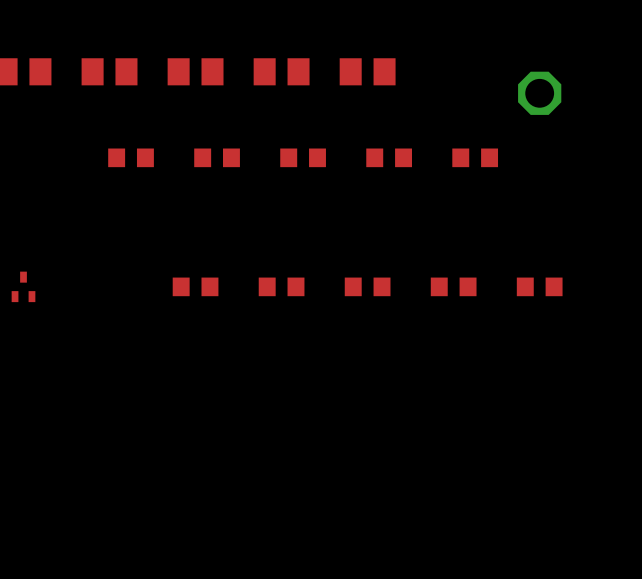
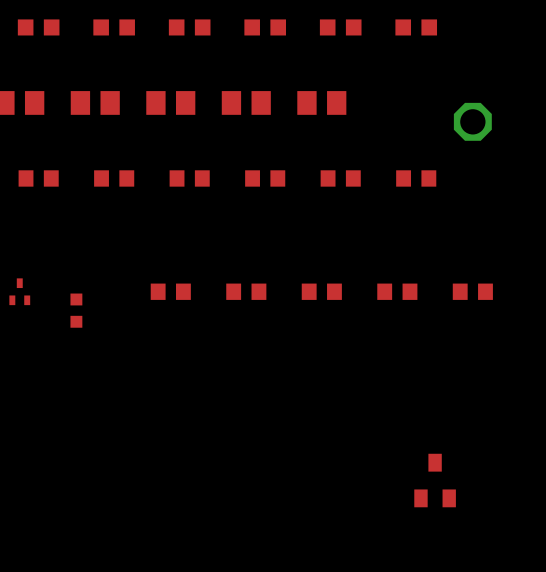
part: none -> (38, 178)
part: none -> (76, 310)
part: none -> (435, 480)

